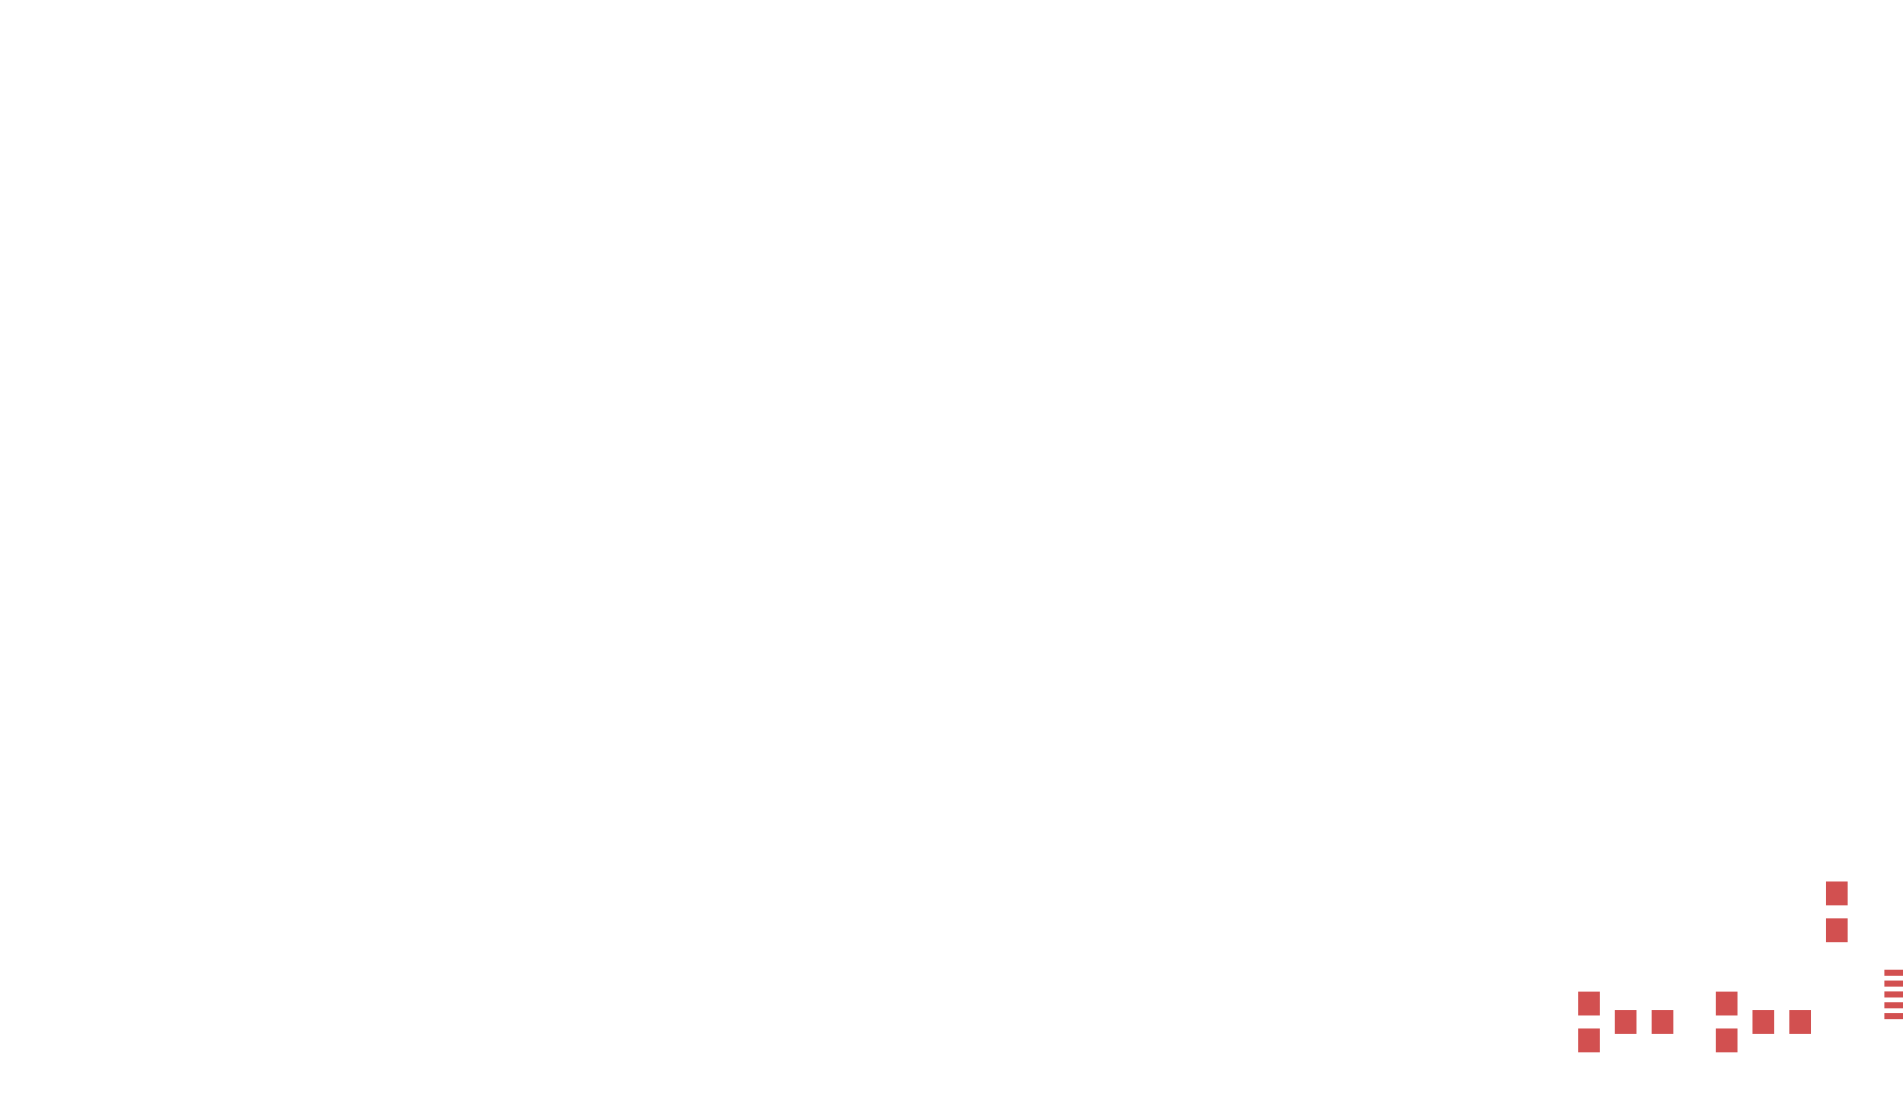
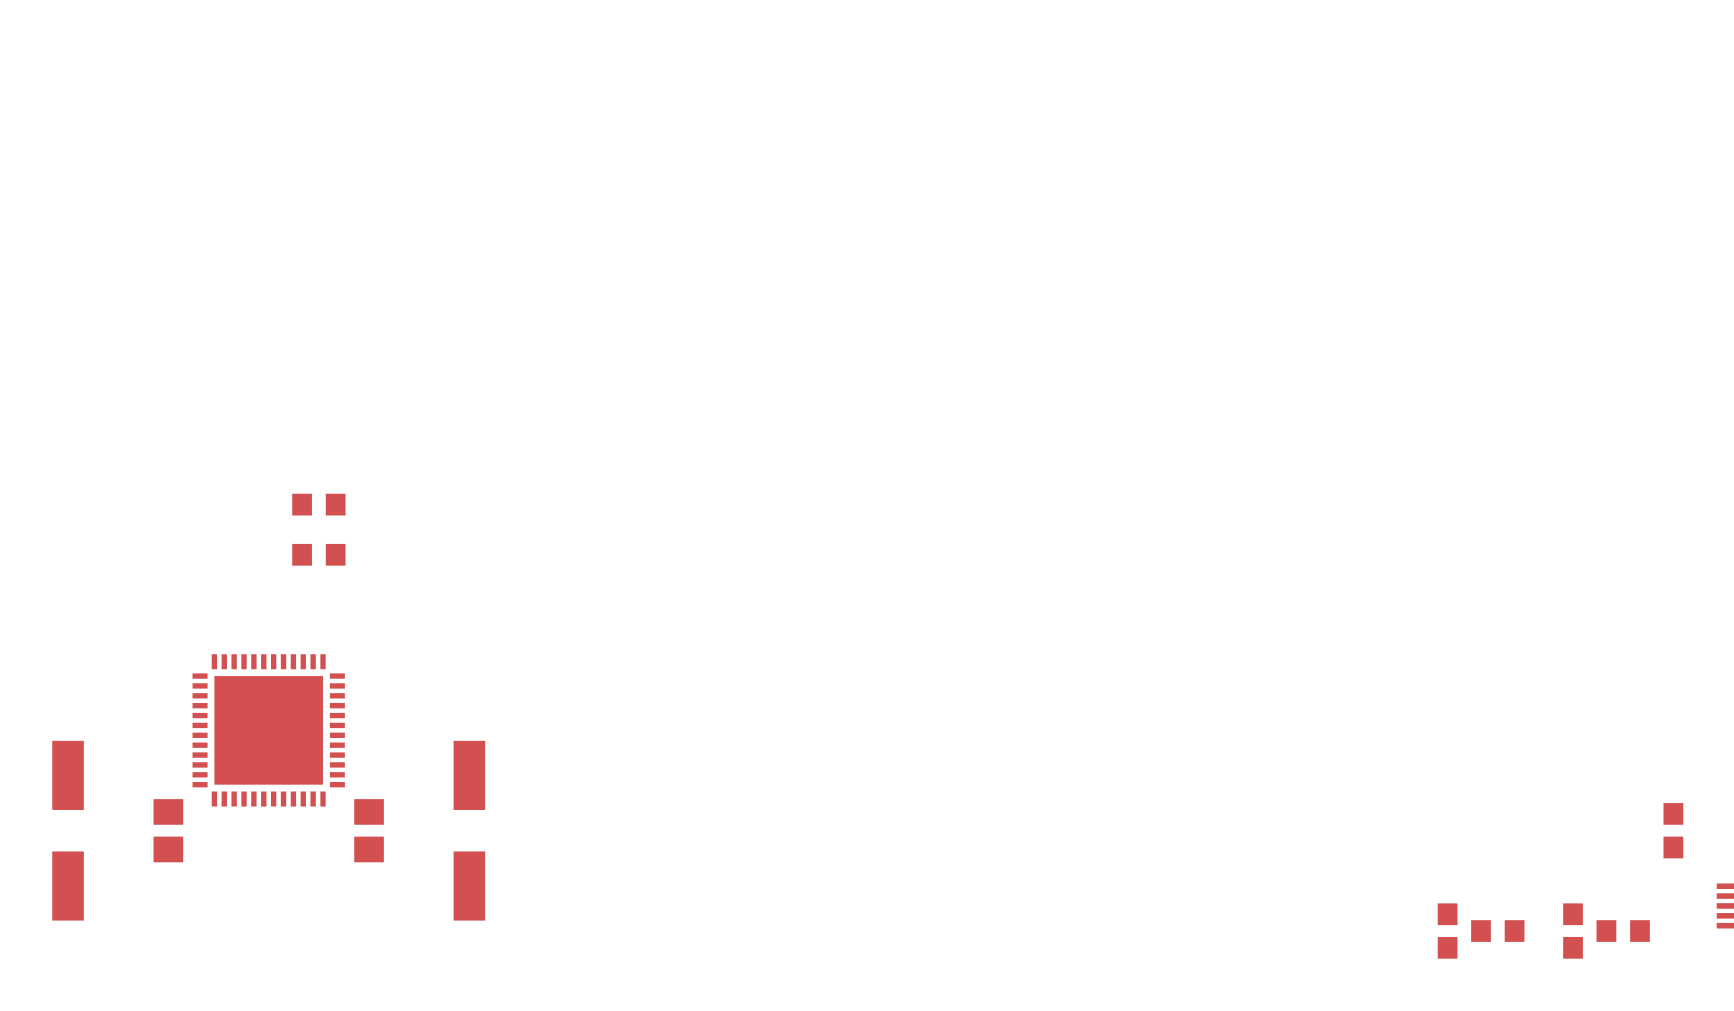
part: none -> (318, 504)
part: none -> (318, 554)
part: none -> (268, 730)
part: none -> (68, 830)
part: none -> (168, 830)
part: none -> (369, 830)
part: none -> (469, 830)

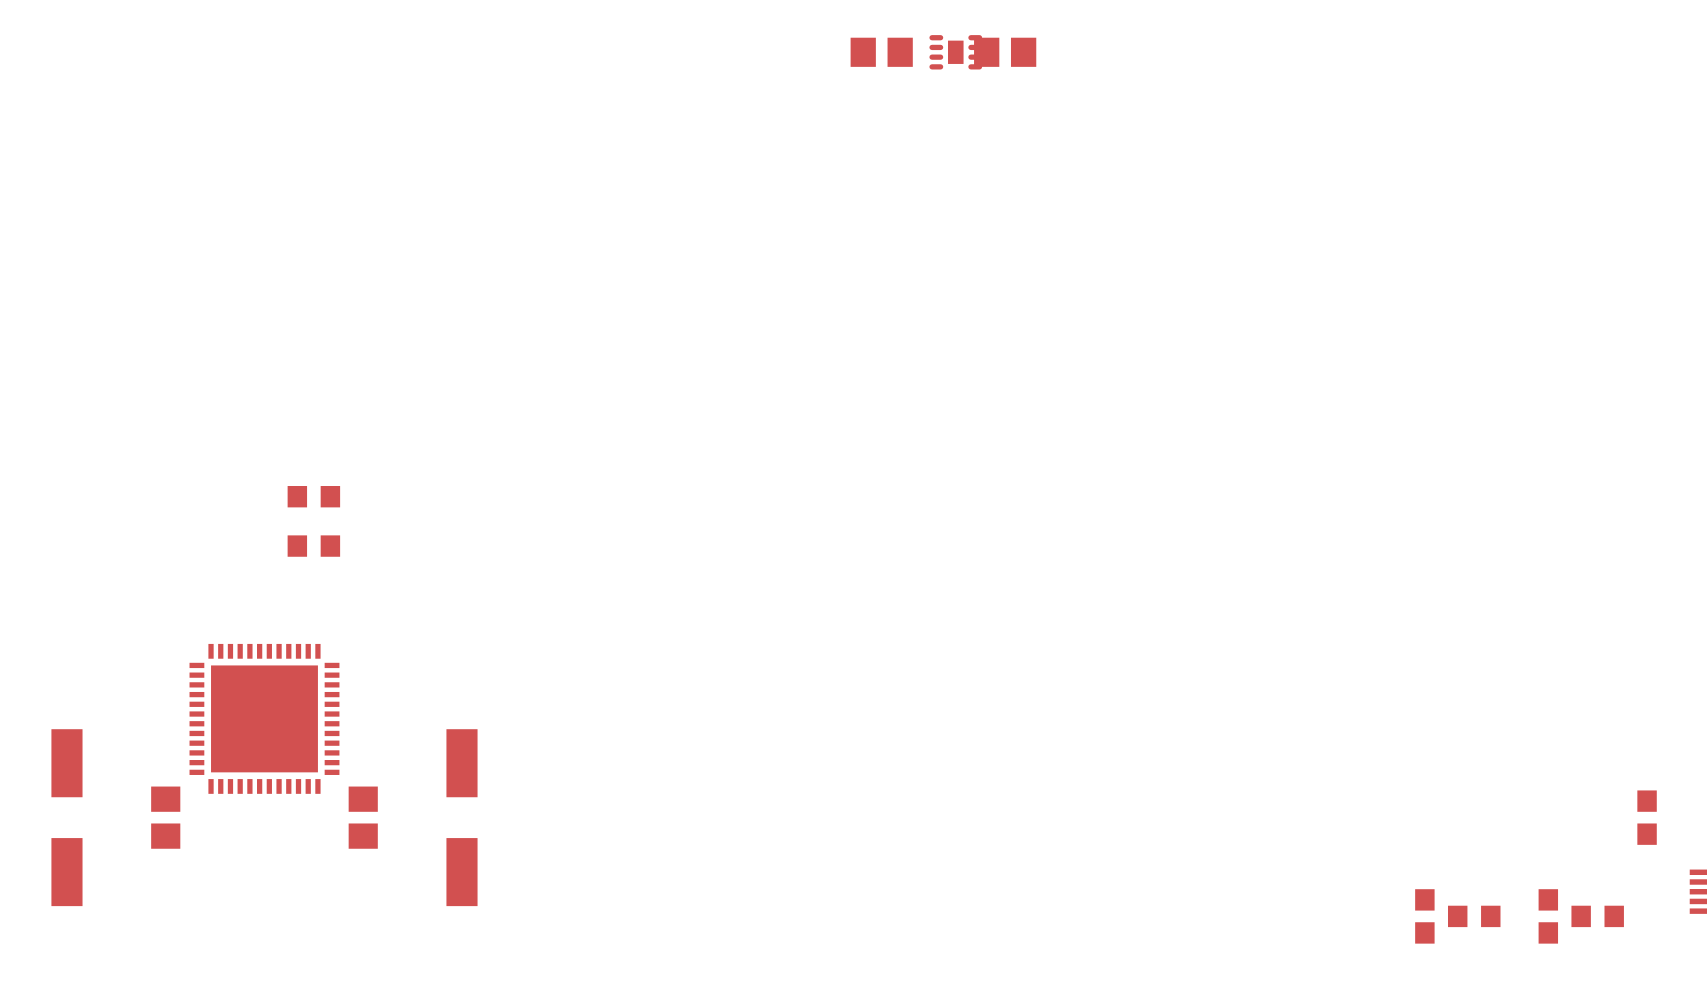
part: none -> (881, 52)
part: none -> (955, 52)
part: none -> (1005, 52)

